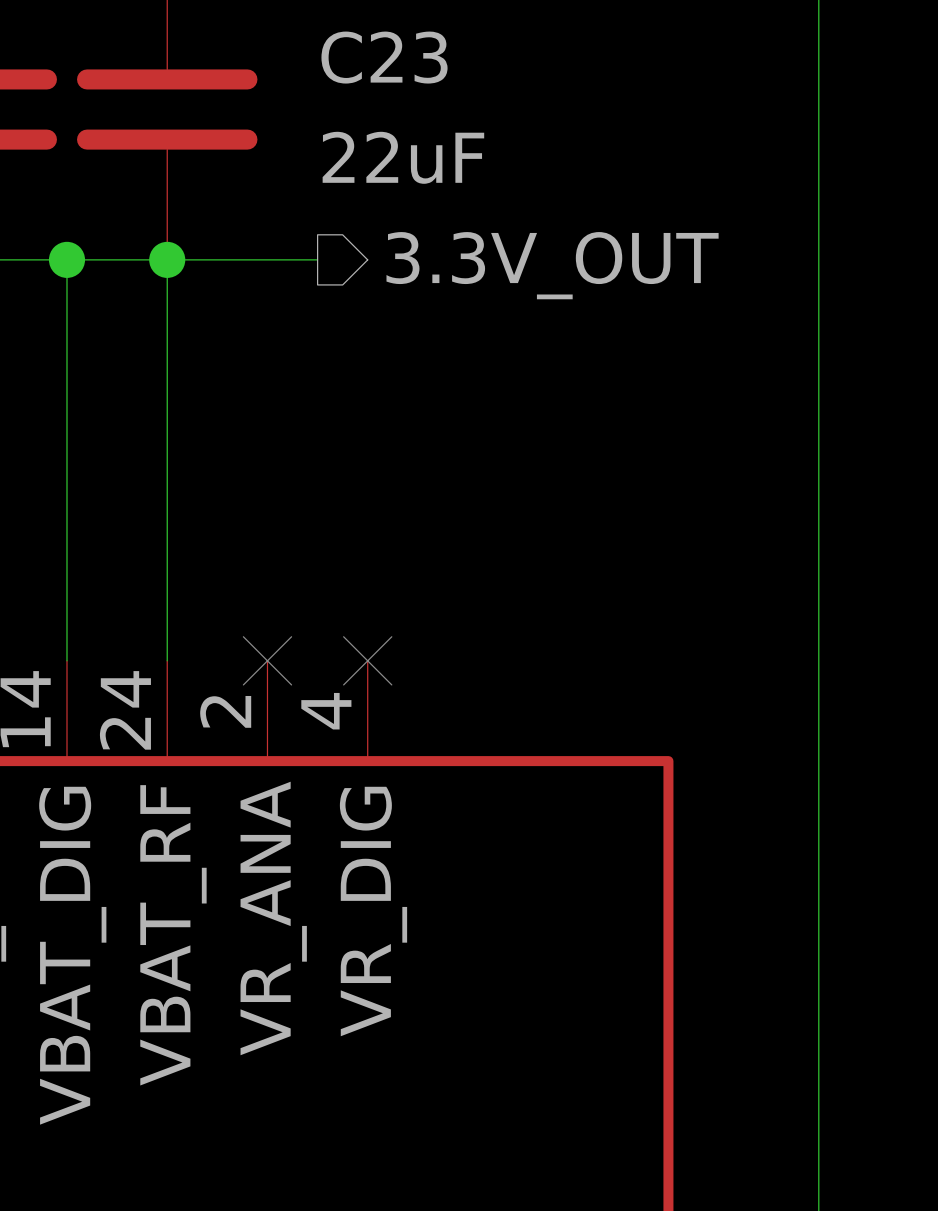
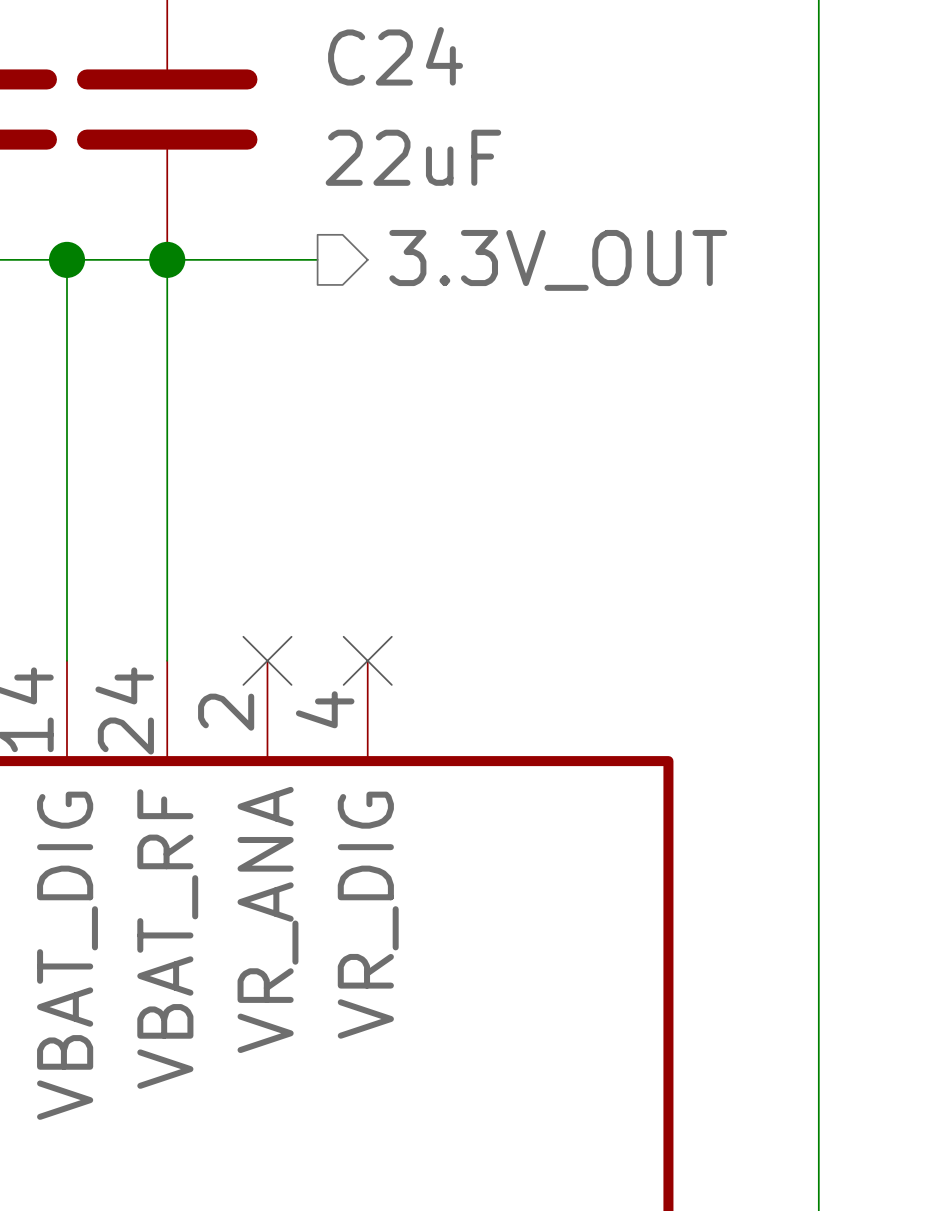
C23 name: C23 (384, 57) -> C24 (395, 56)

